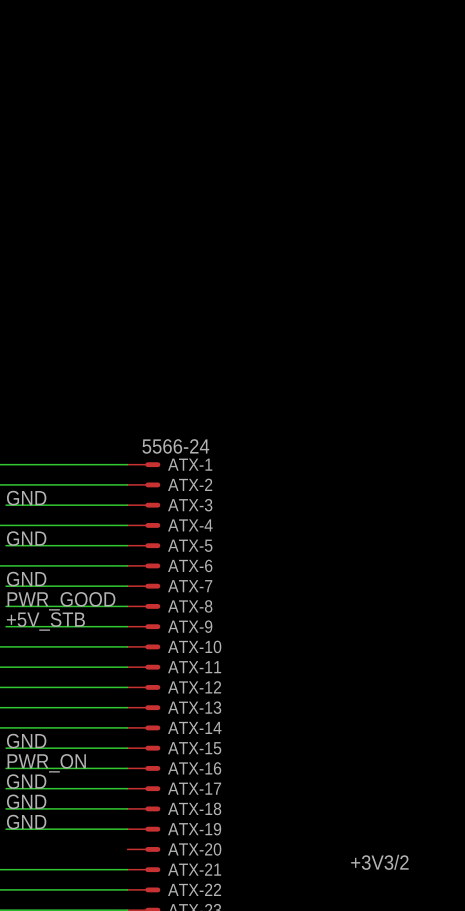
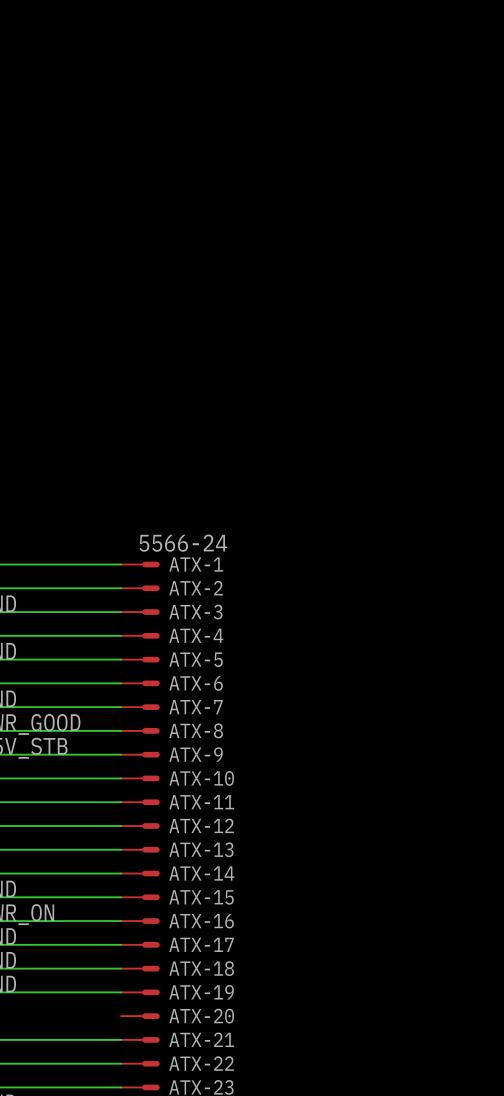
label: +3V3/2 (379, 862) -> none

